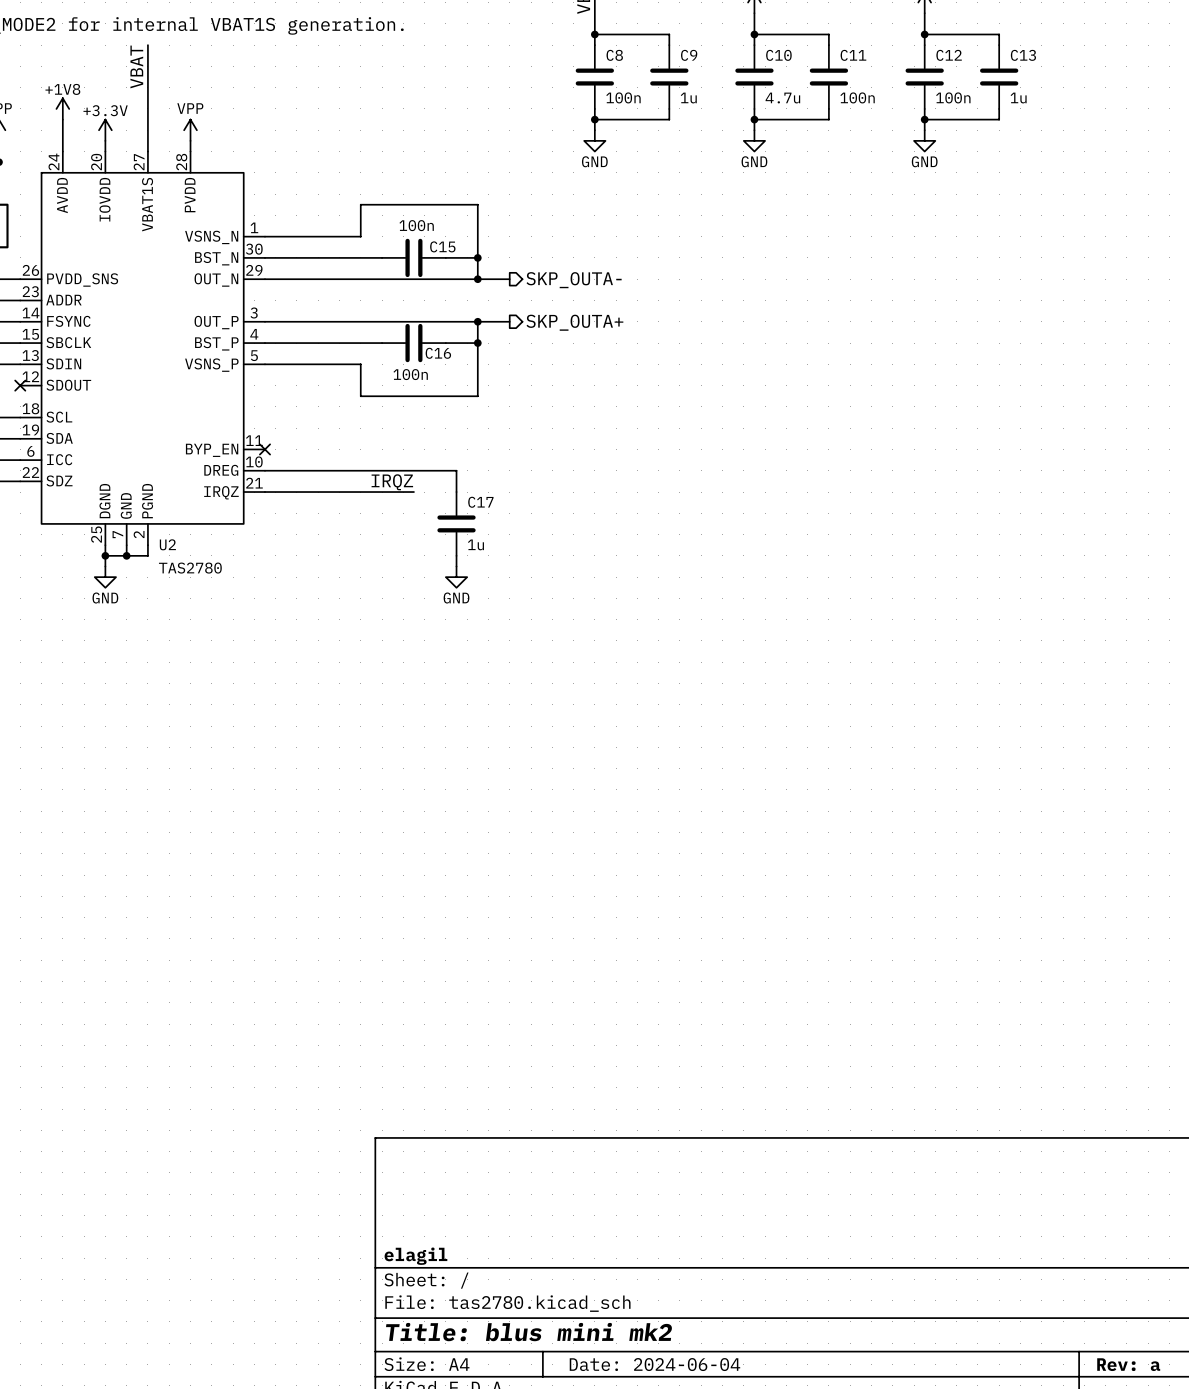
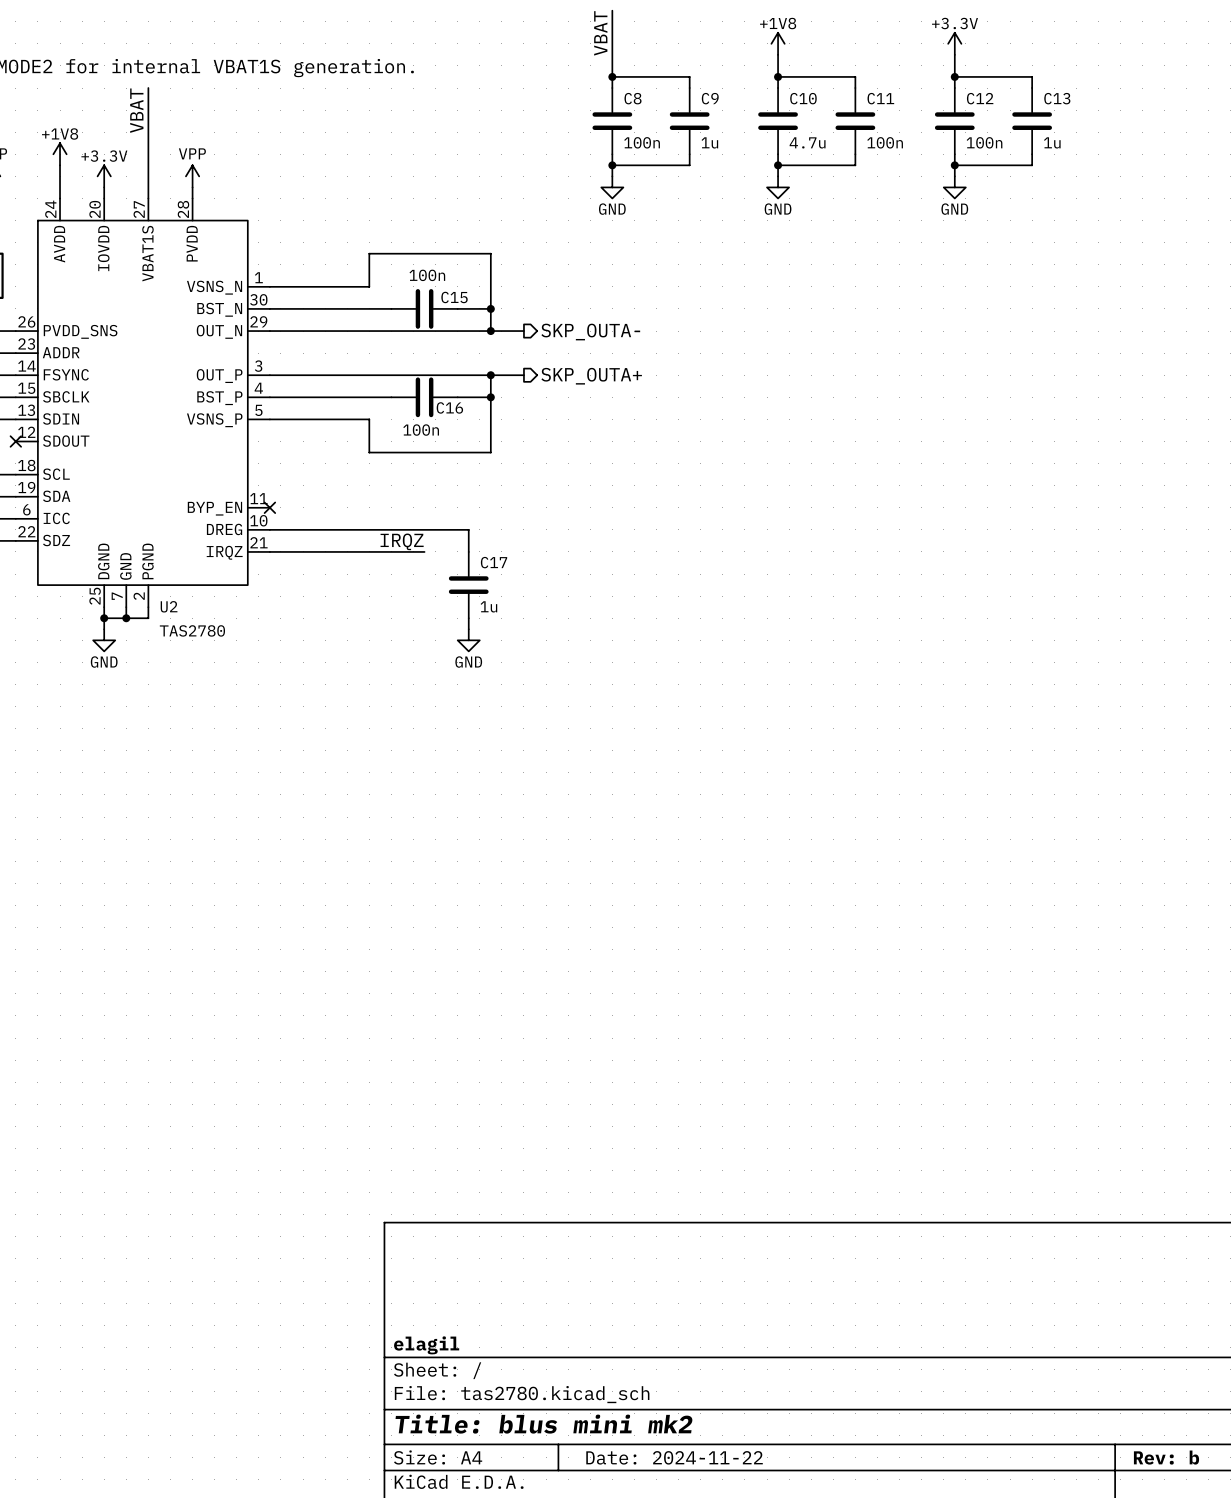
title block: Date: 2024-06-04 (654, 1364) -> Date: 2024-11-22 (674, 1457)
title block: Rev: a (1128, 1364) -> Rev: b (1166, 1457)

